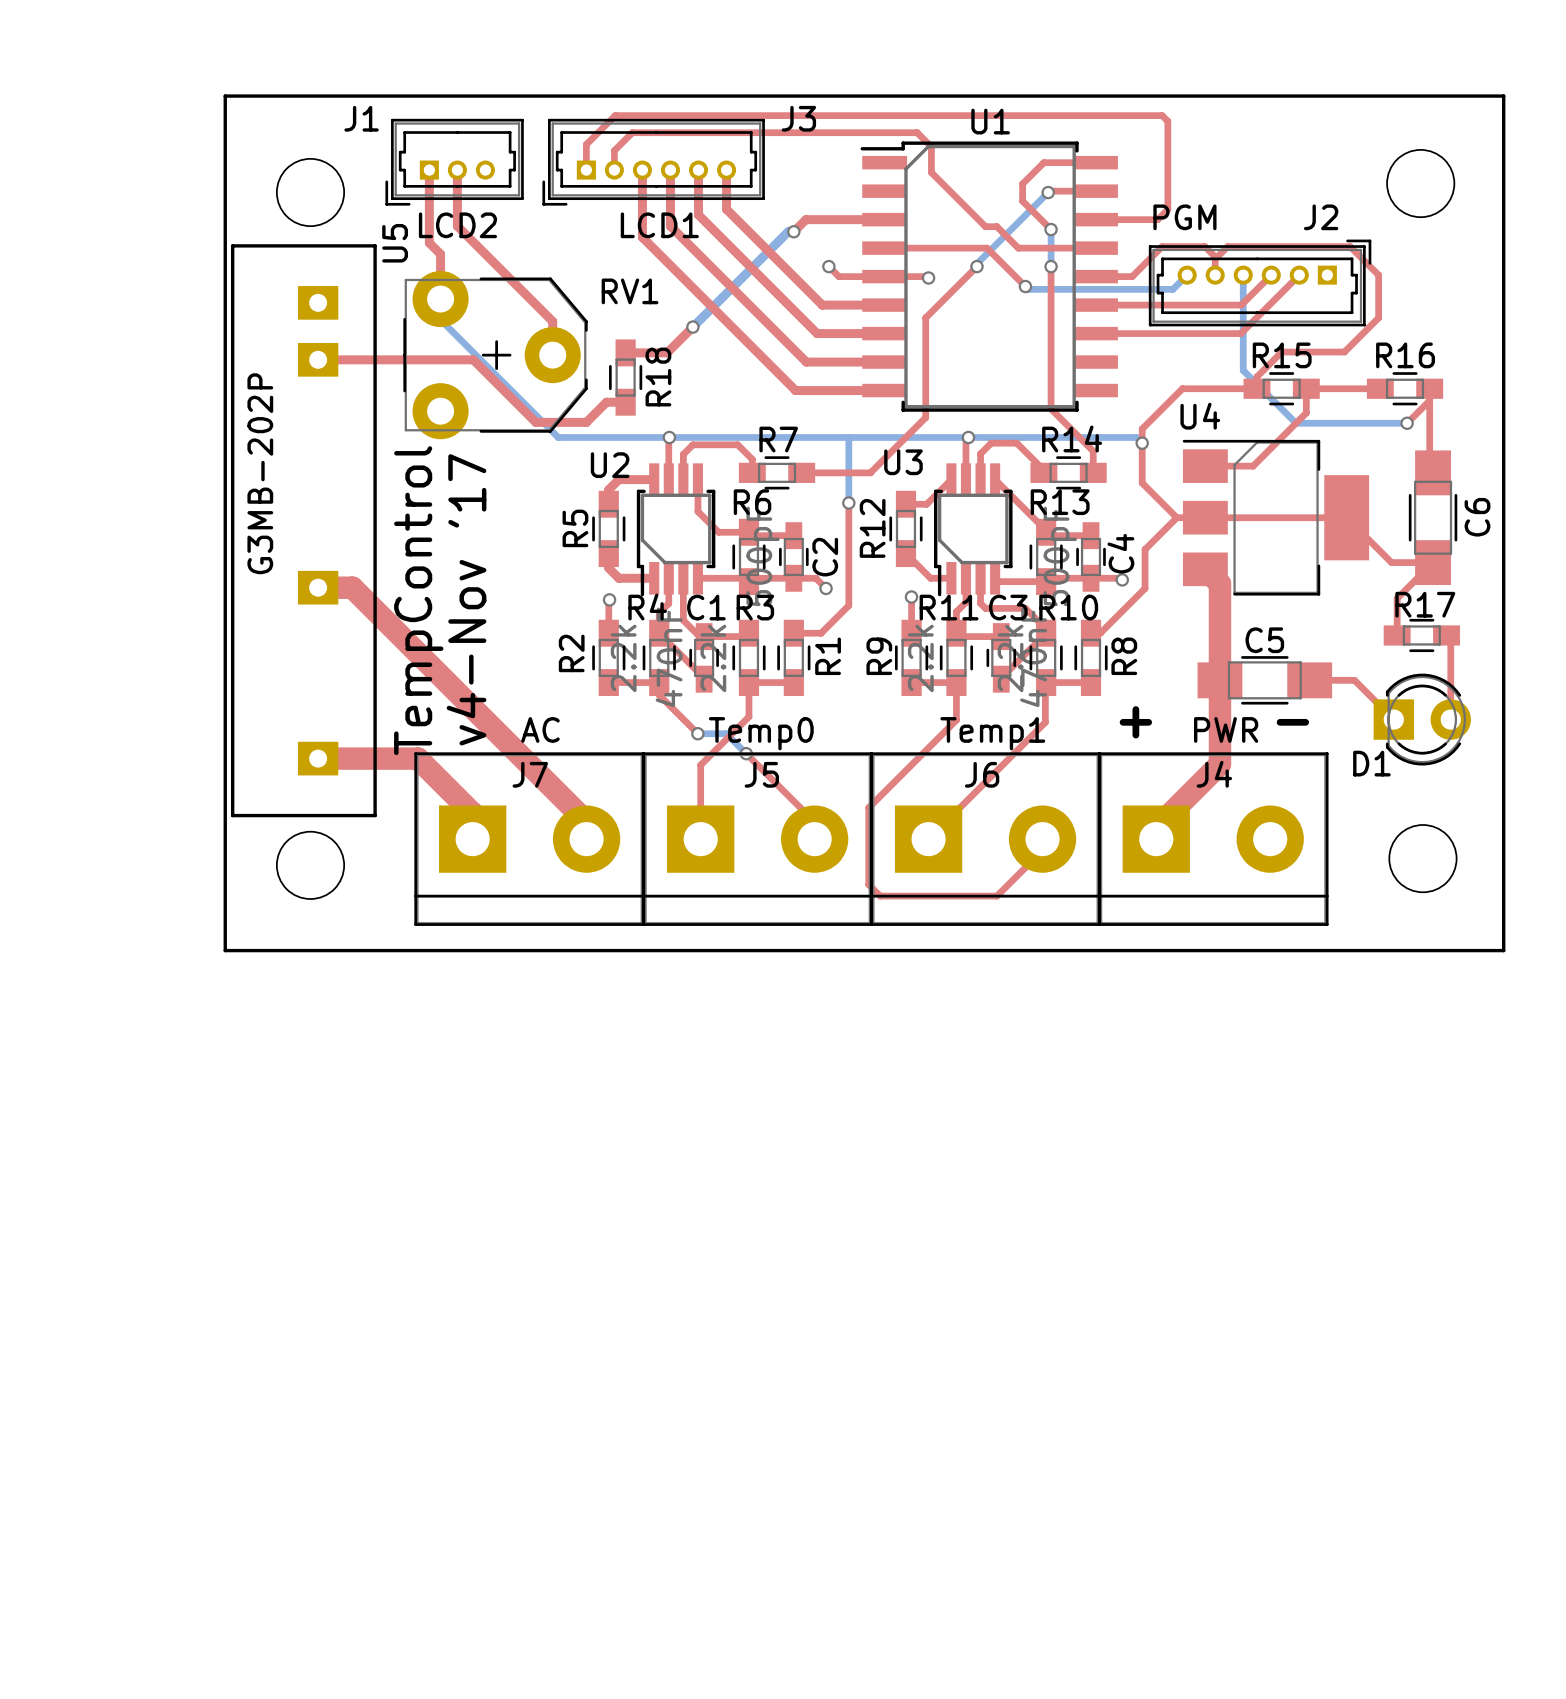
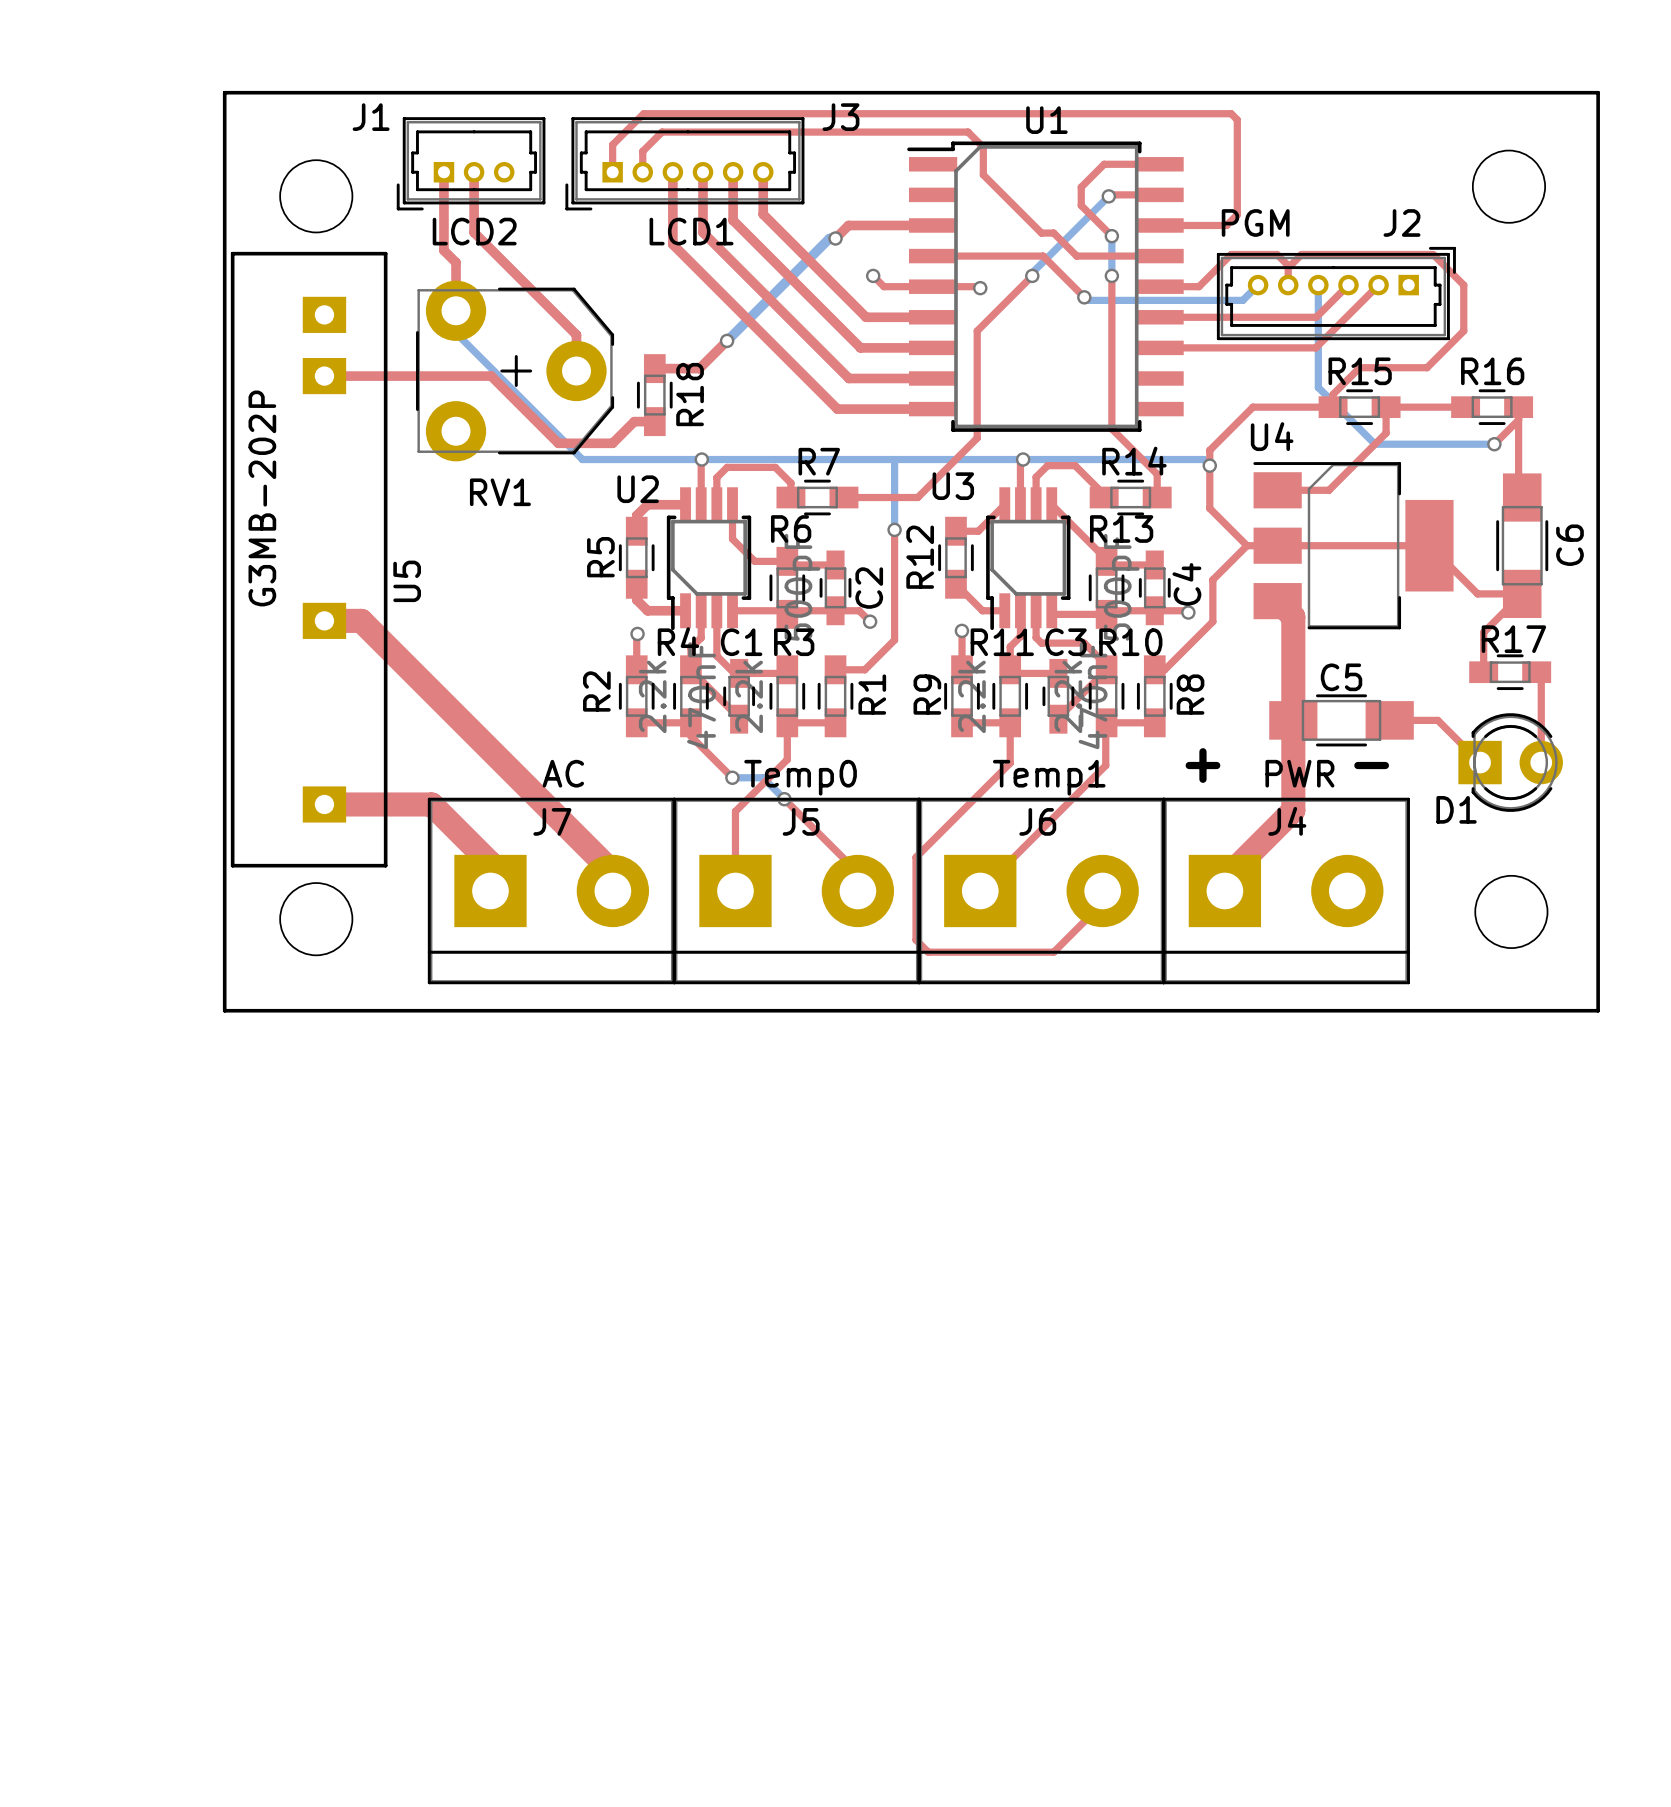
U5 name position: U5 (395, 243) -> U5 (407, 581)
RV1 name position: RV1 (630, 291) -> RV1 (500, 492)
text: v4-Nov '17 (466, 599) -> none
text: TempControl (418, 600) -> none

